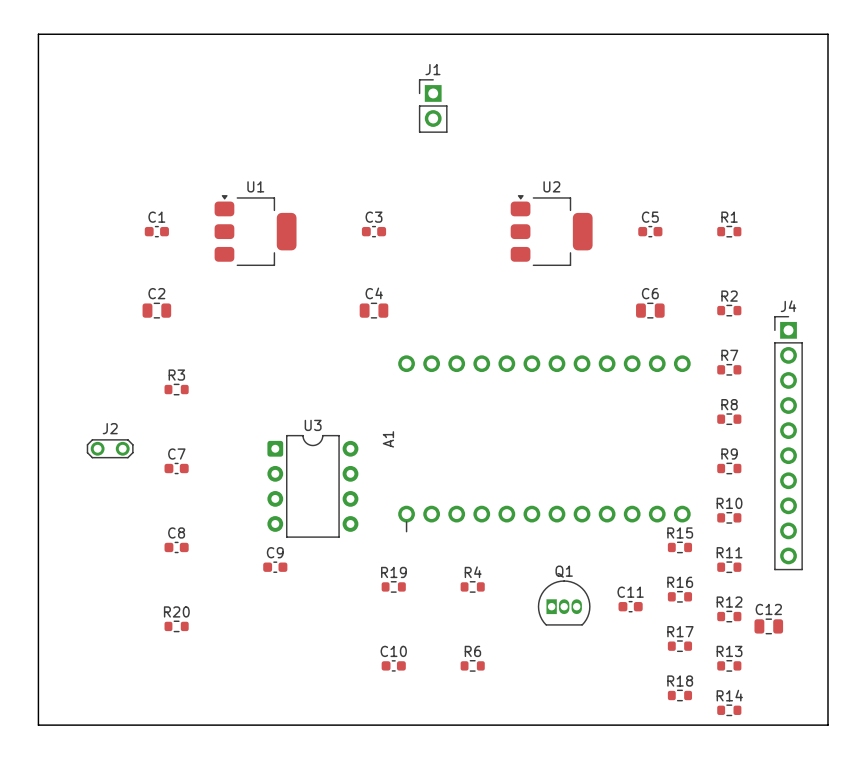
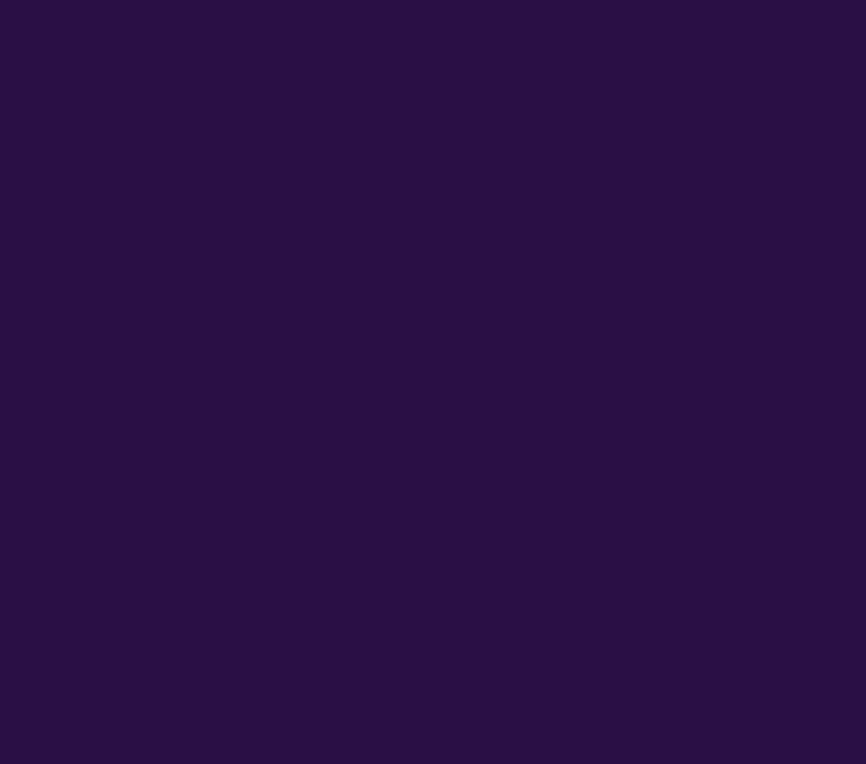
board edge: (38, 34) (827, 34) (827, 725) (38, 725) (38, 34) -> none
J1: (433, 105) -> none
U1: (255, 230) -> none
U2: (551, 230) -> none
C1: (156, 231) -> none
C3: (373, 231) -> none
C5: (650, 231) -> none
R1: (729, 231) -> none
C2: (156, 310) -> none
C4: (373, 310) -> none
C6: (650, 310) -> none
R2: (729, 310) -> none
R7: (729, 369) -> none
R3: (176, 389) -> none
R8: (729, 419) -> none
A1: (544, 443) -> none
J4: (788, 443) -> none
J2: (110, 448) -> none
C7: (176, 468) -> none
R9: (729, 468) -> none
U3: (312, 486) -> none
R10: (729, 517) -> none
C8: (176, 547) -> none
R15: (679, 547) -> none
C9: (275, 567) -> none
R11: (729, 567) -> none
R19: (393, 586) -> none
R4: (472, 586) -> none
R16: (679, 596) -> none
Q1: (564, 602) -> none
C11: (630, 606) -> none
R12: (729, 616) -> none
R20: (176, 626) -> none
C12: (768, 626) -> none
R17: (679, 646) -> none
C10: (393, 665) -> none
R6: (472, 665) -> none
R13: (729, 665) -> none
R18: (679, 695) -> none
R14: (729, 710) -> none

